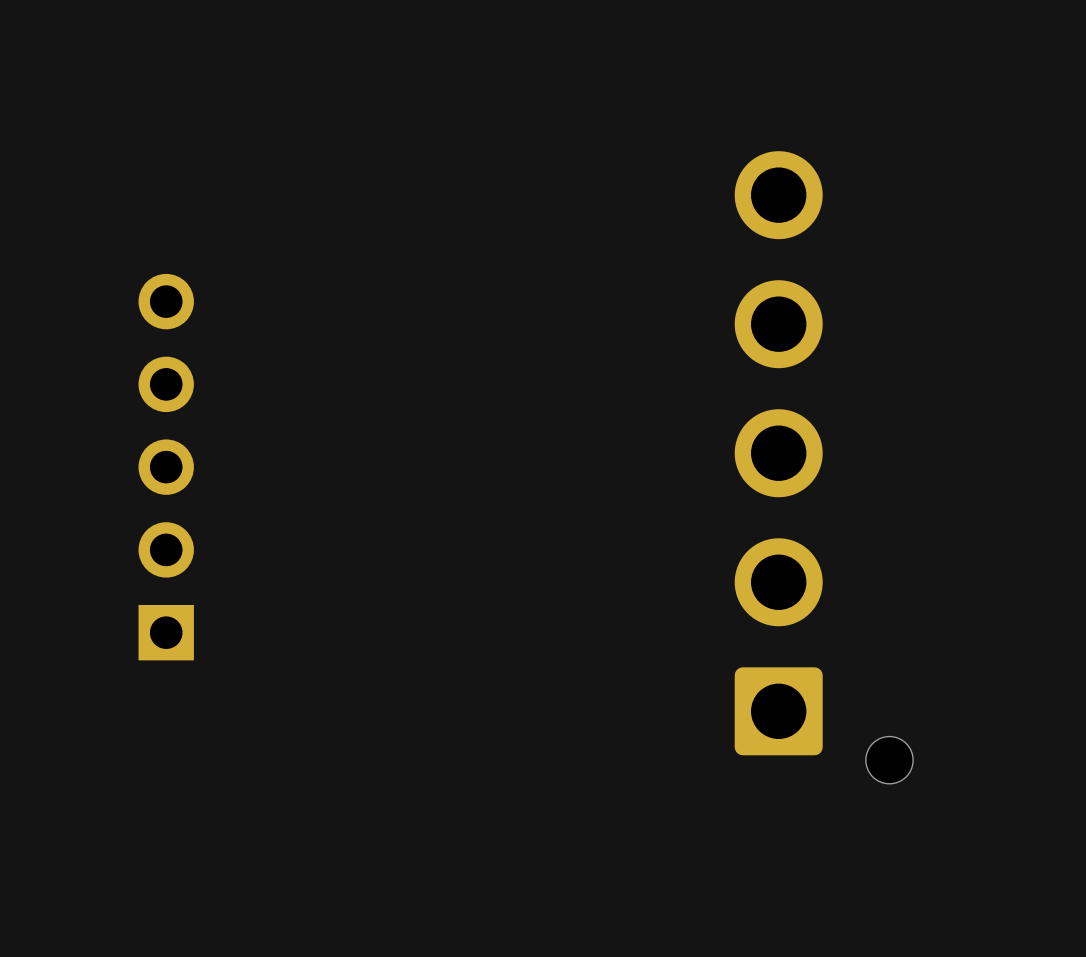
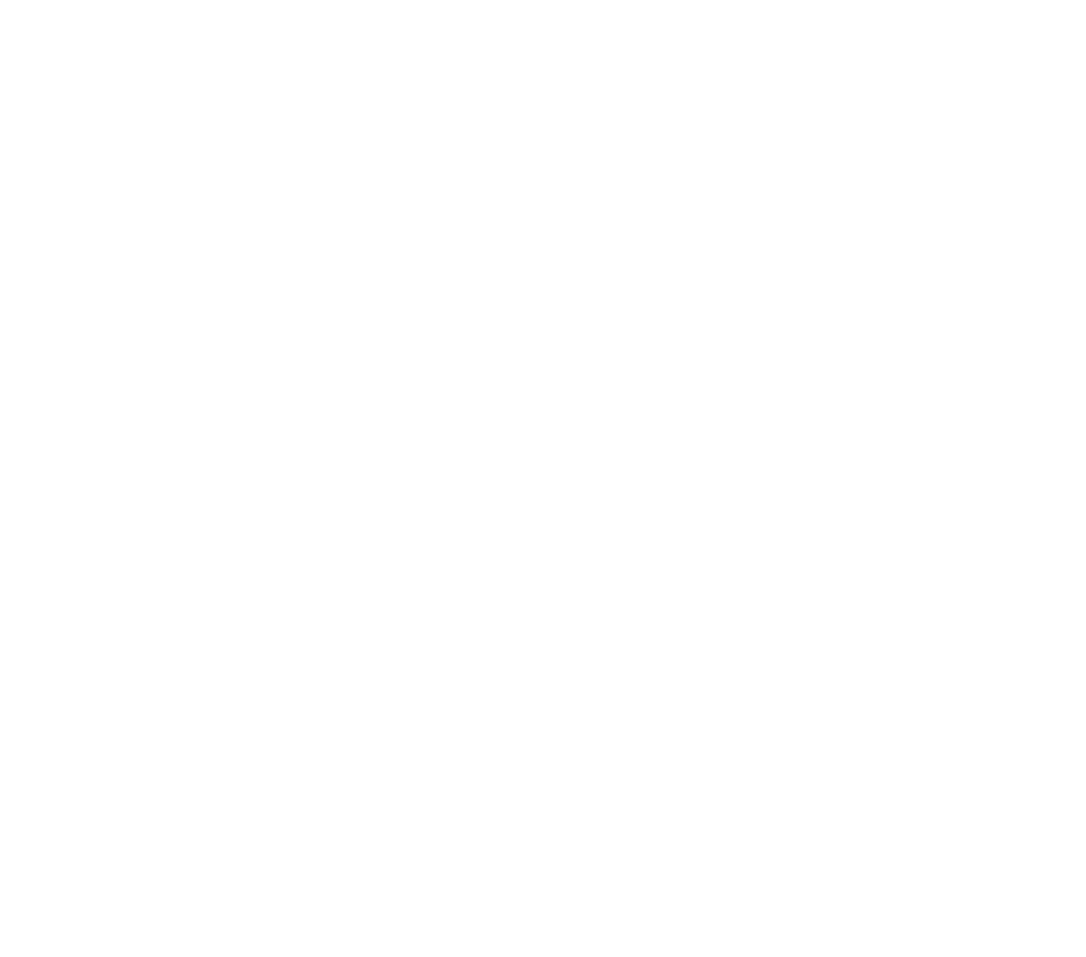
part: (166, 467) -> none
part: (823, 467) -> none

